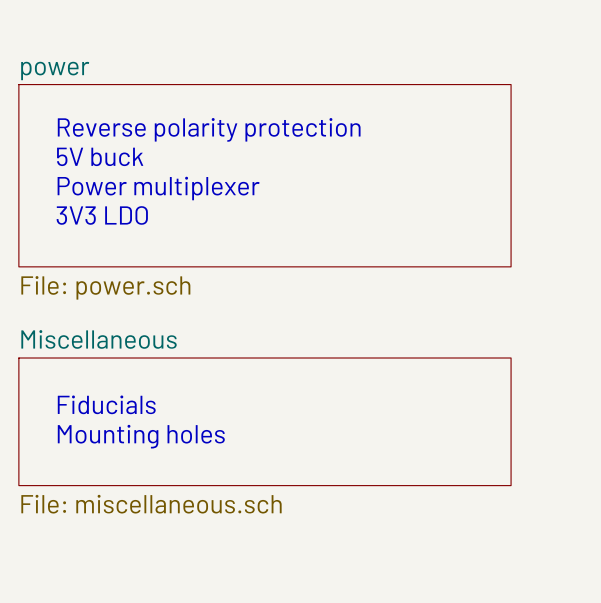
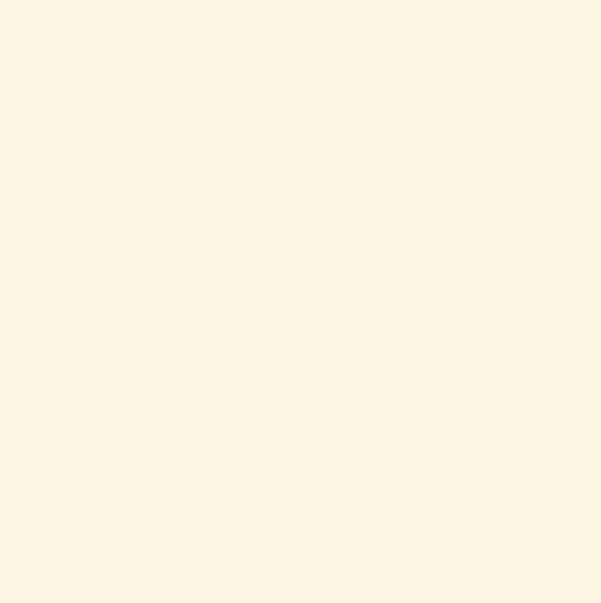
text: Reverse polarity protection (209, 129) -> none
text: 5V buck (100, 156) -> none
sheet power: File: power.sch (264, 175) -> none
text: Power multiplexer (158, 188) -> none
text: 3V3 LDO (102, 215) -> none
text: Fiducials (106, 404) -> none
sheet Miscellaneous: File: miscellaneous.sch (264, 421) -> none
text: Mounting holes (141, 436) -> none

